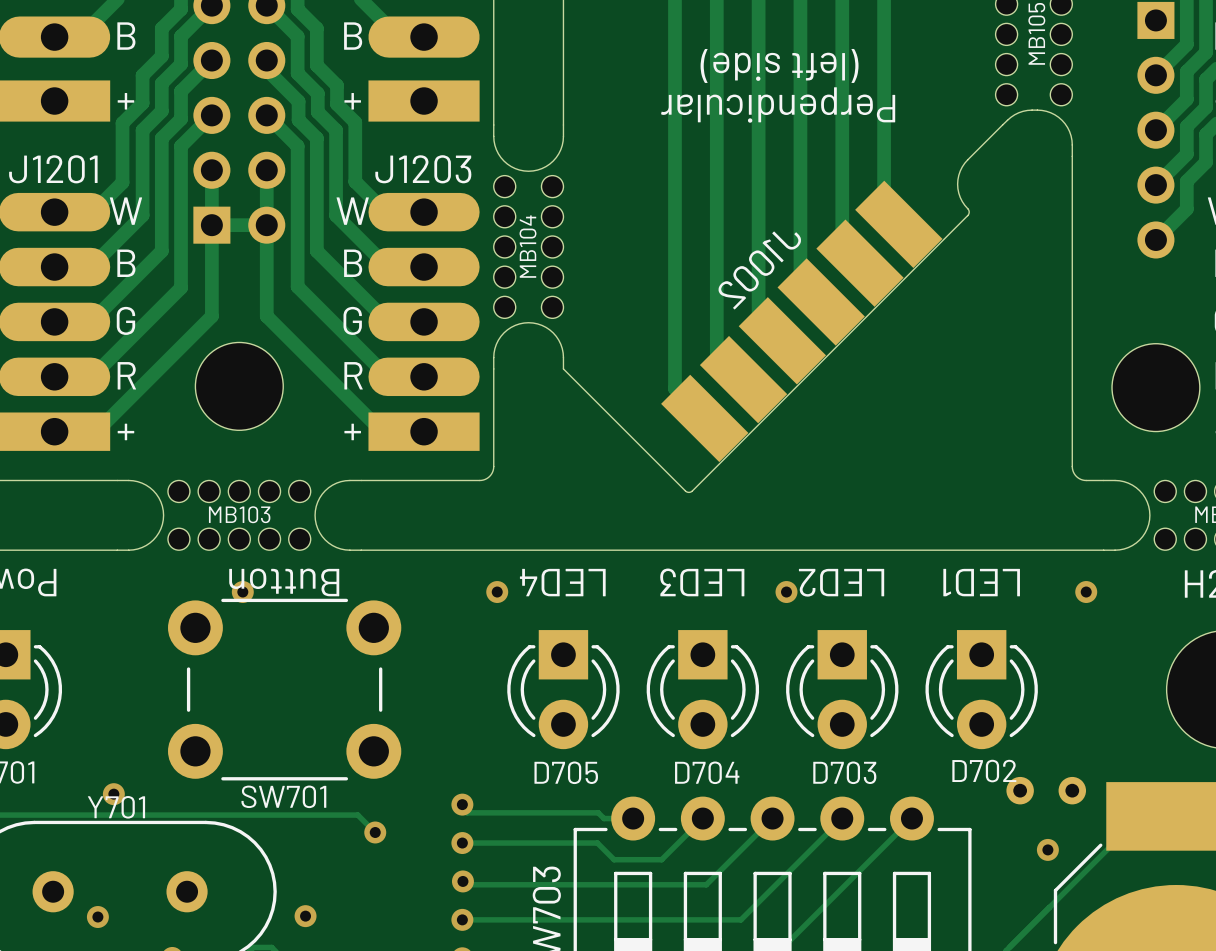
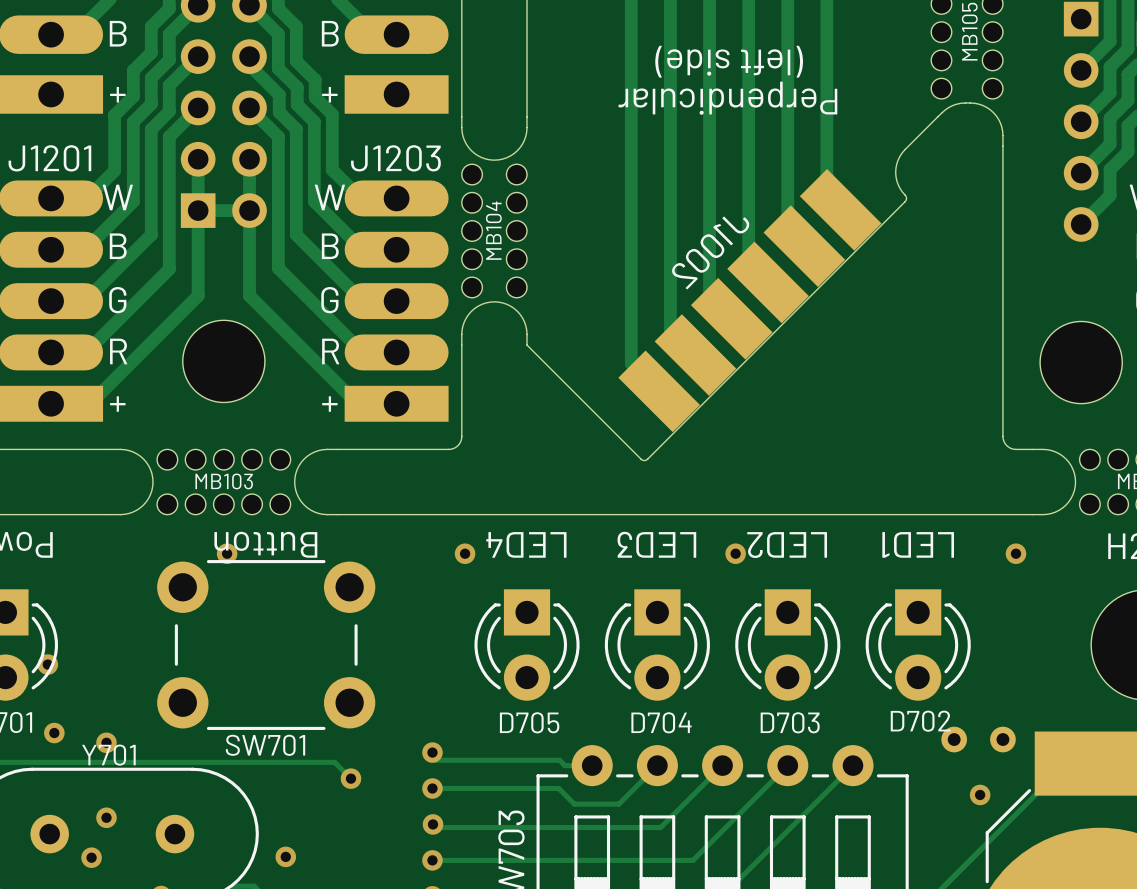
via: none -> (47, 664)
via: none -> (54, 733)
via: none -> (106, 817)

